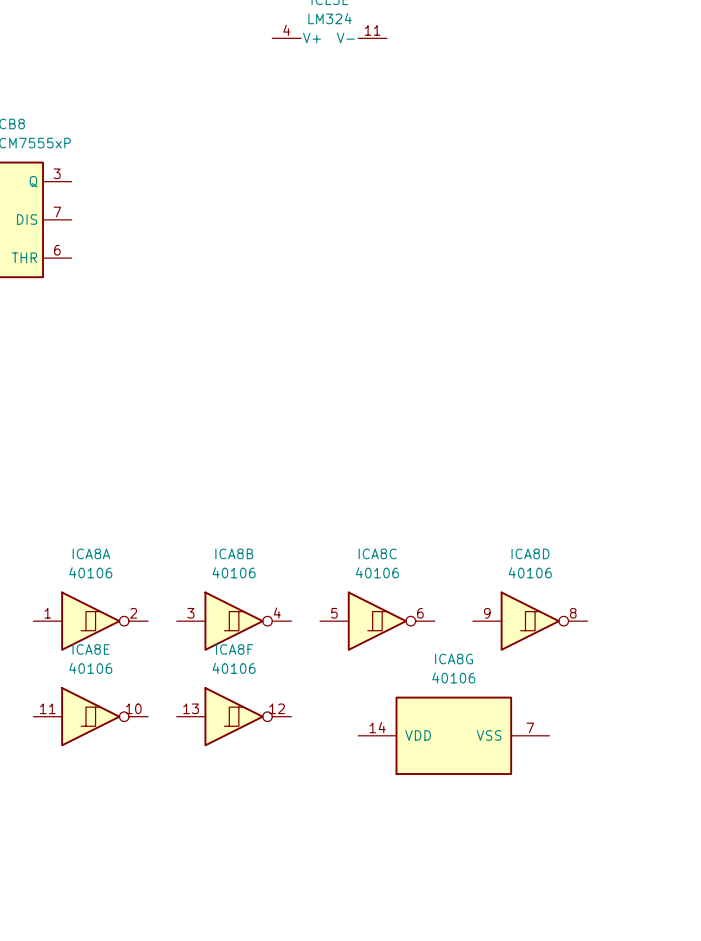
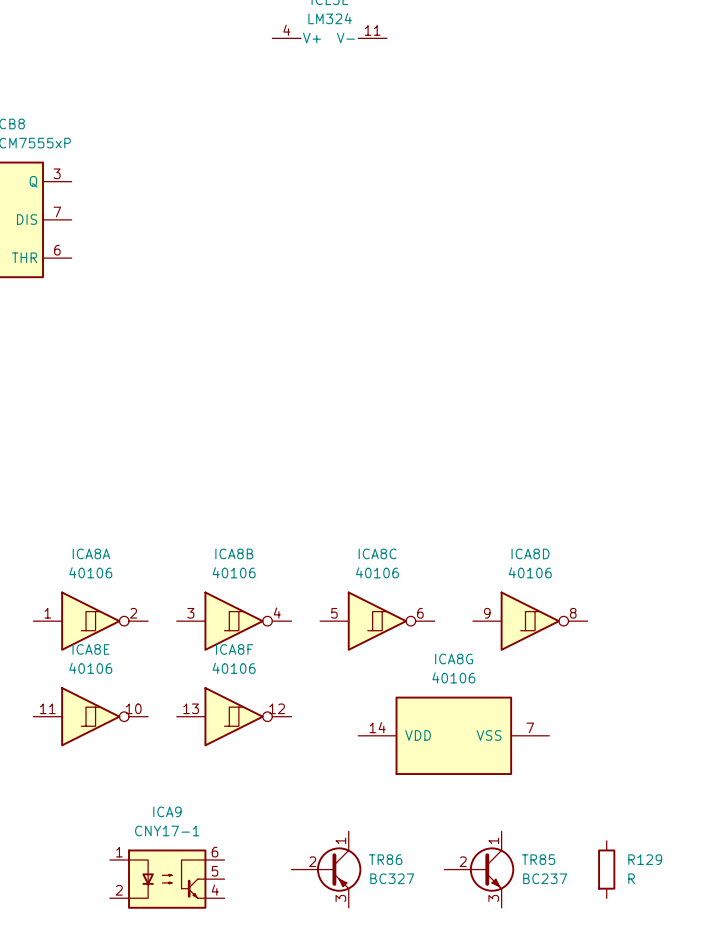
TR86: none -> BC327 (326, 869)
TR85: none -> BC237 (479, 869)
R129: none -> R (606, 869)
ICA9: none -> CNY17-1 (167, 879)

